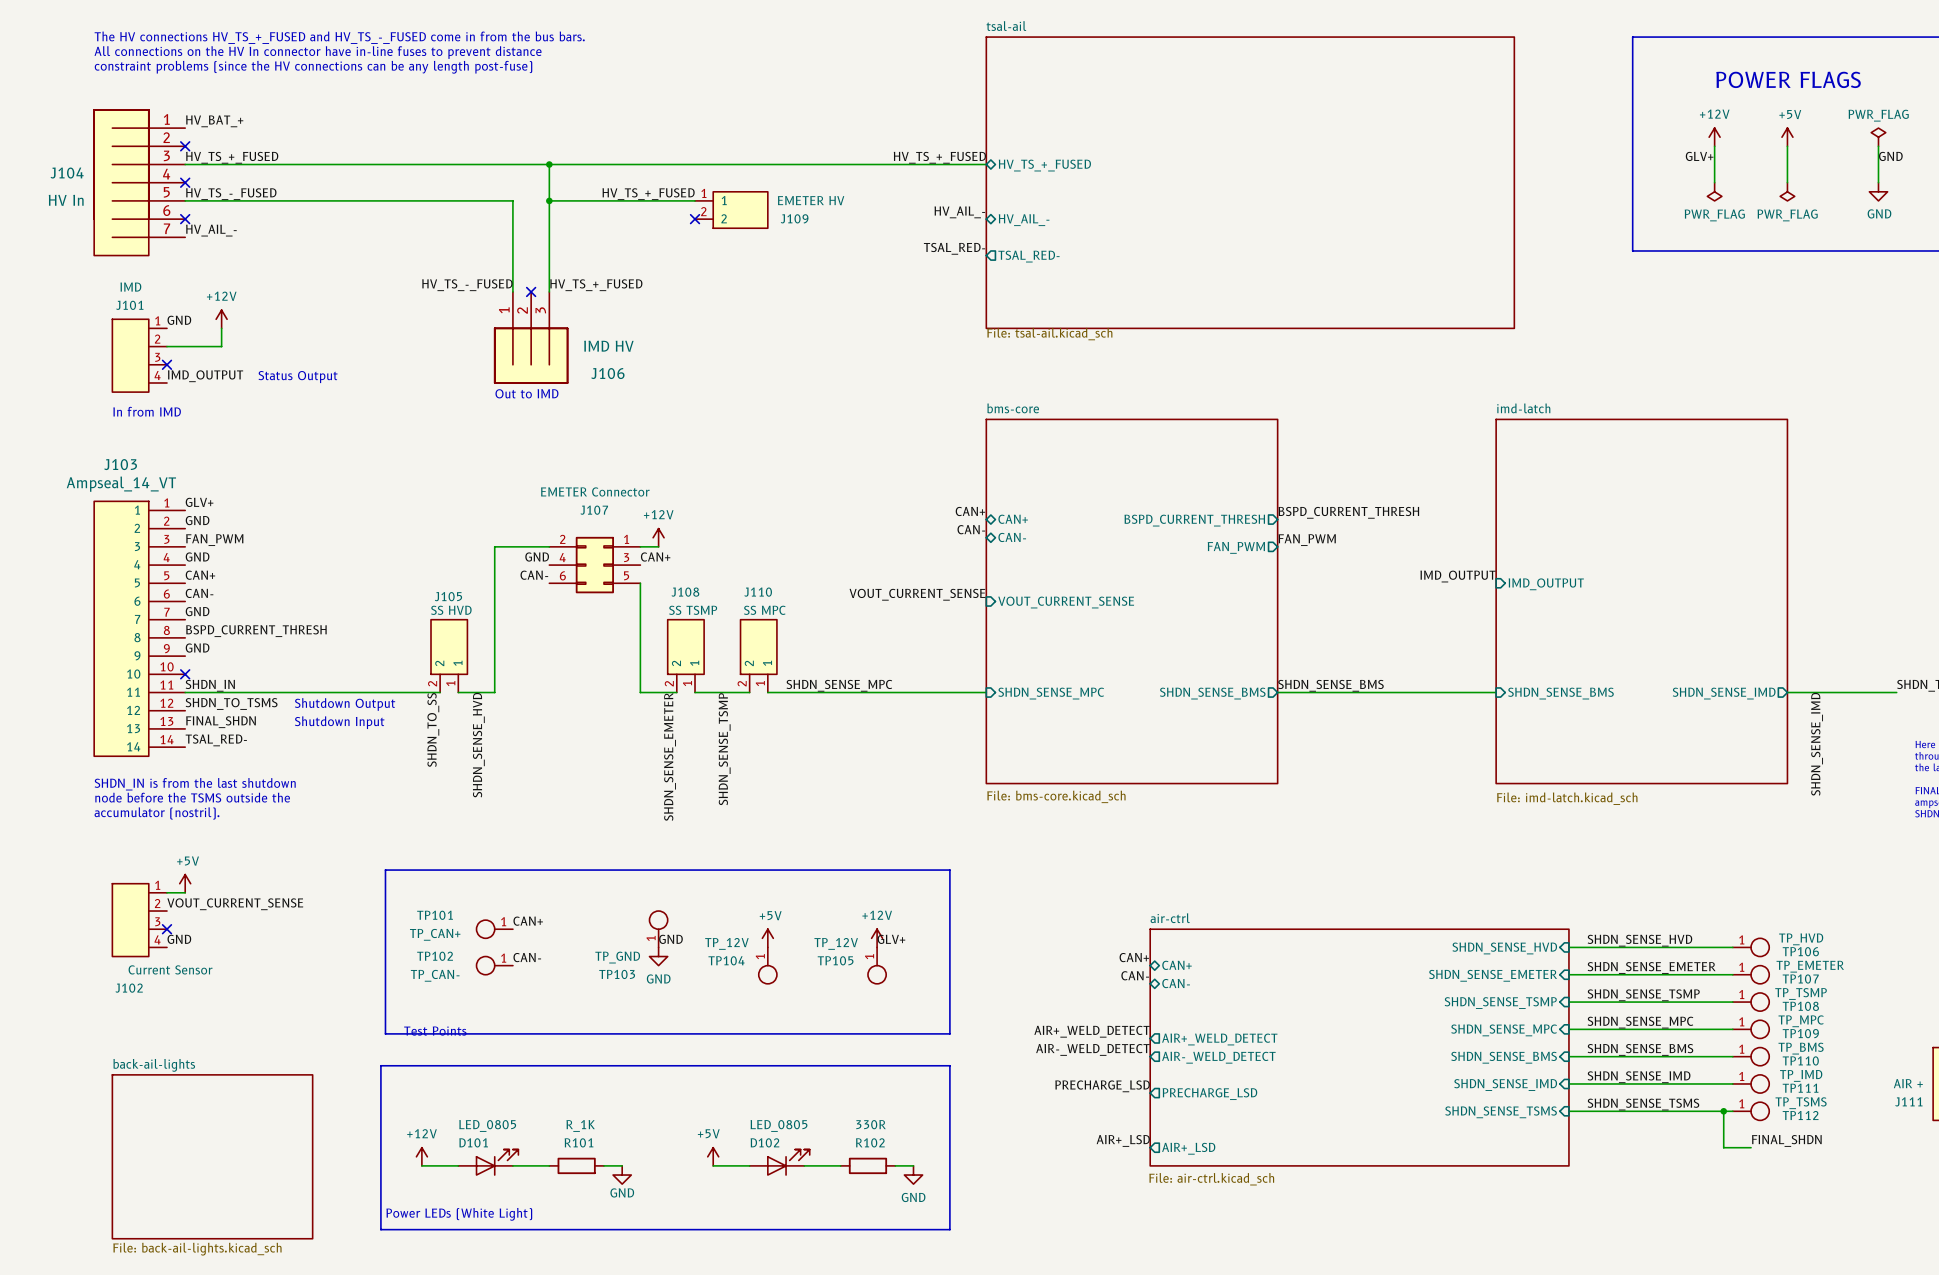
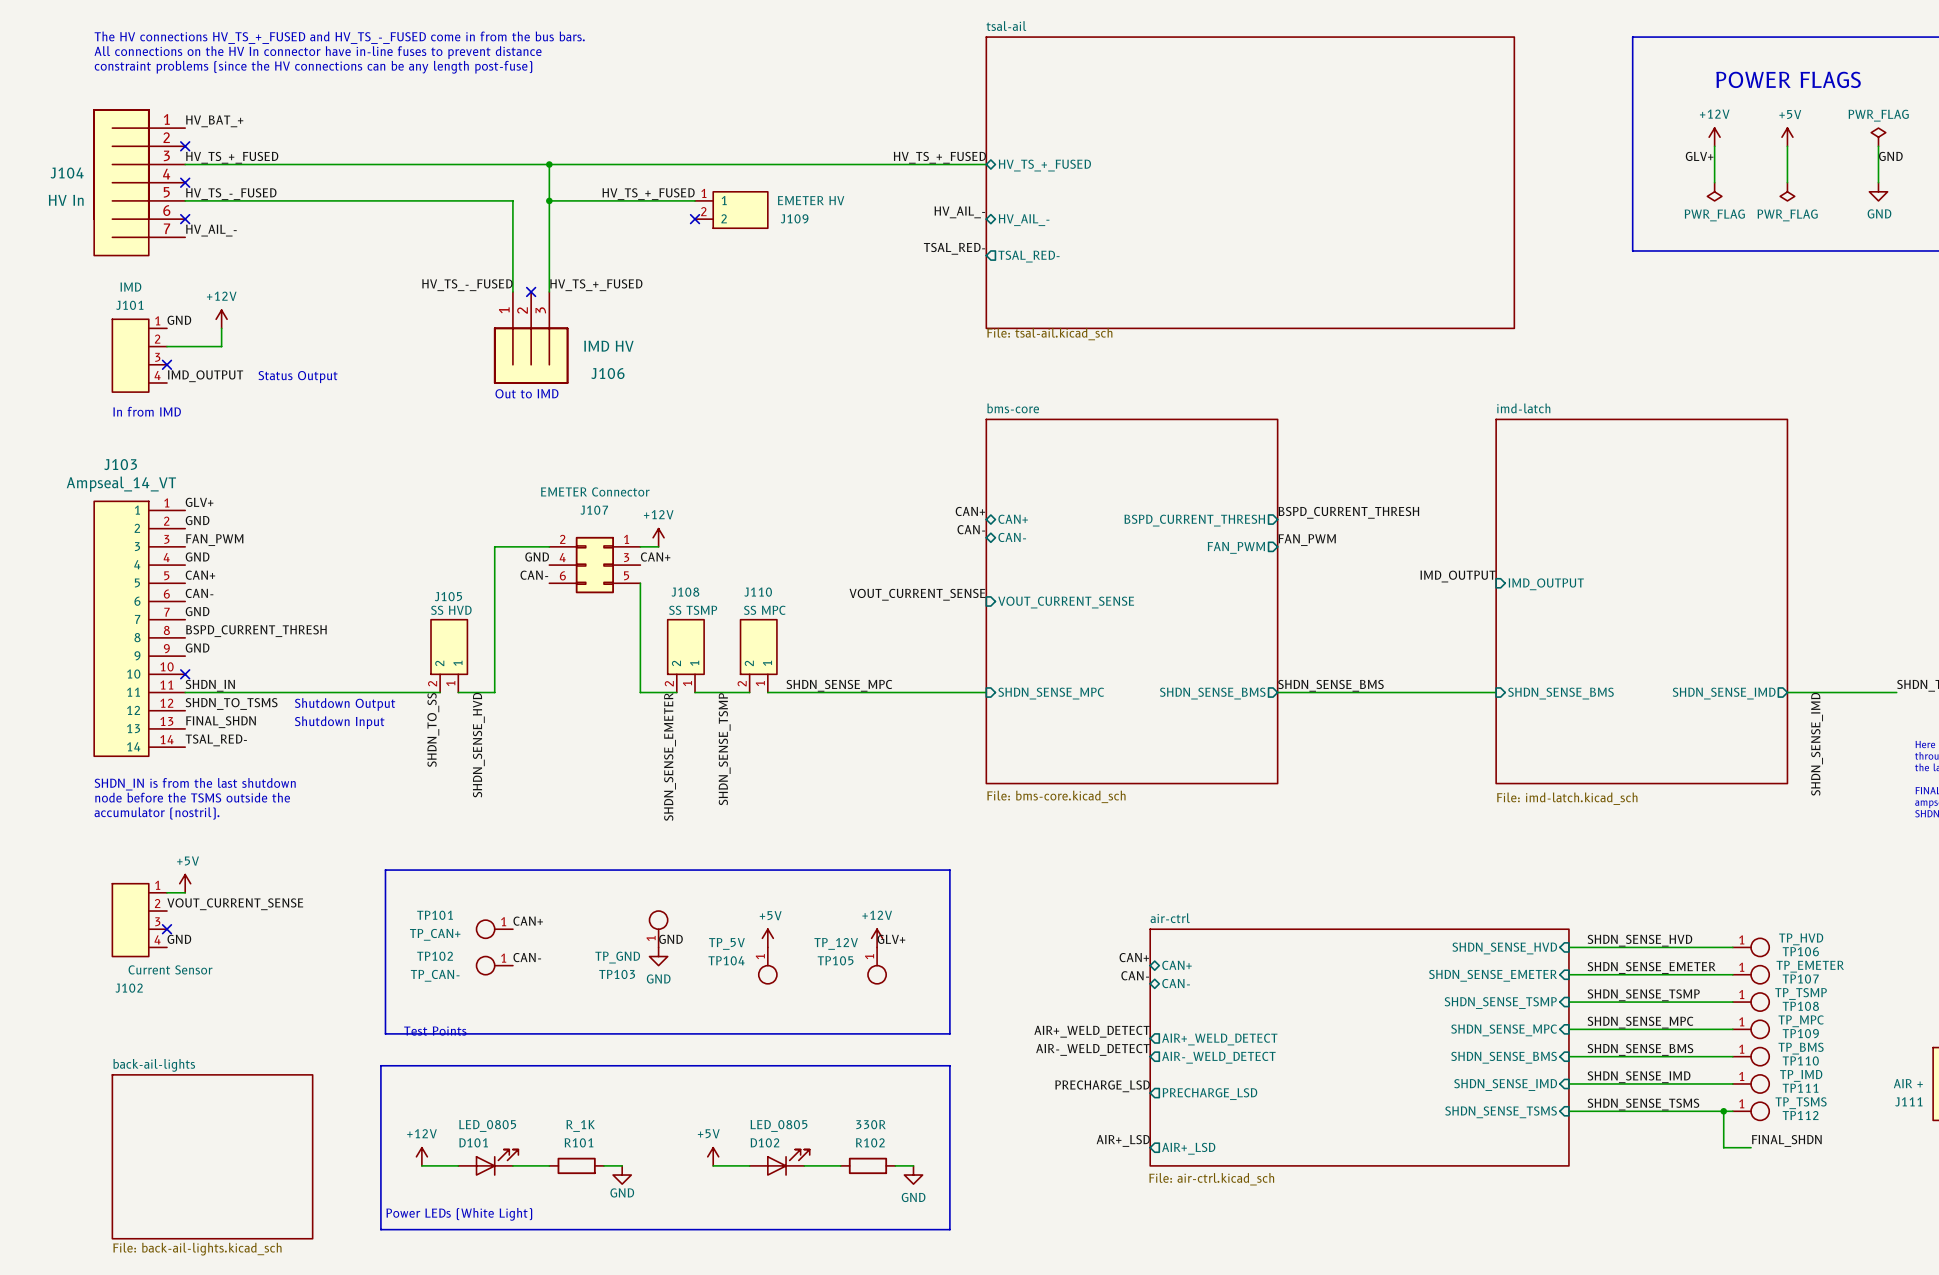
TP104 value: TP_12V (726, 943) -> TP_5V (726, 943)

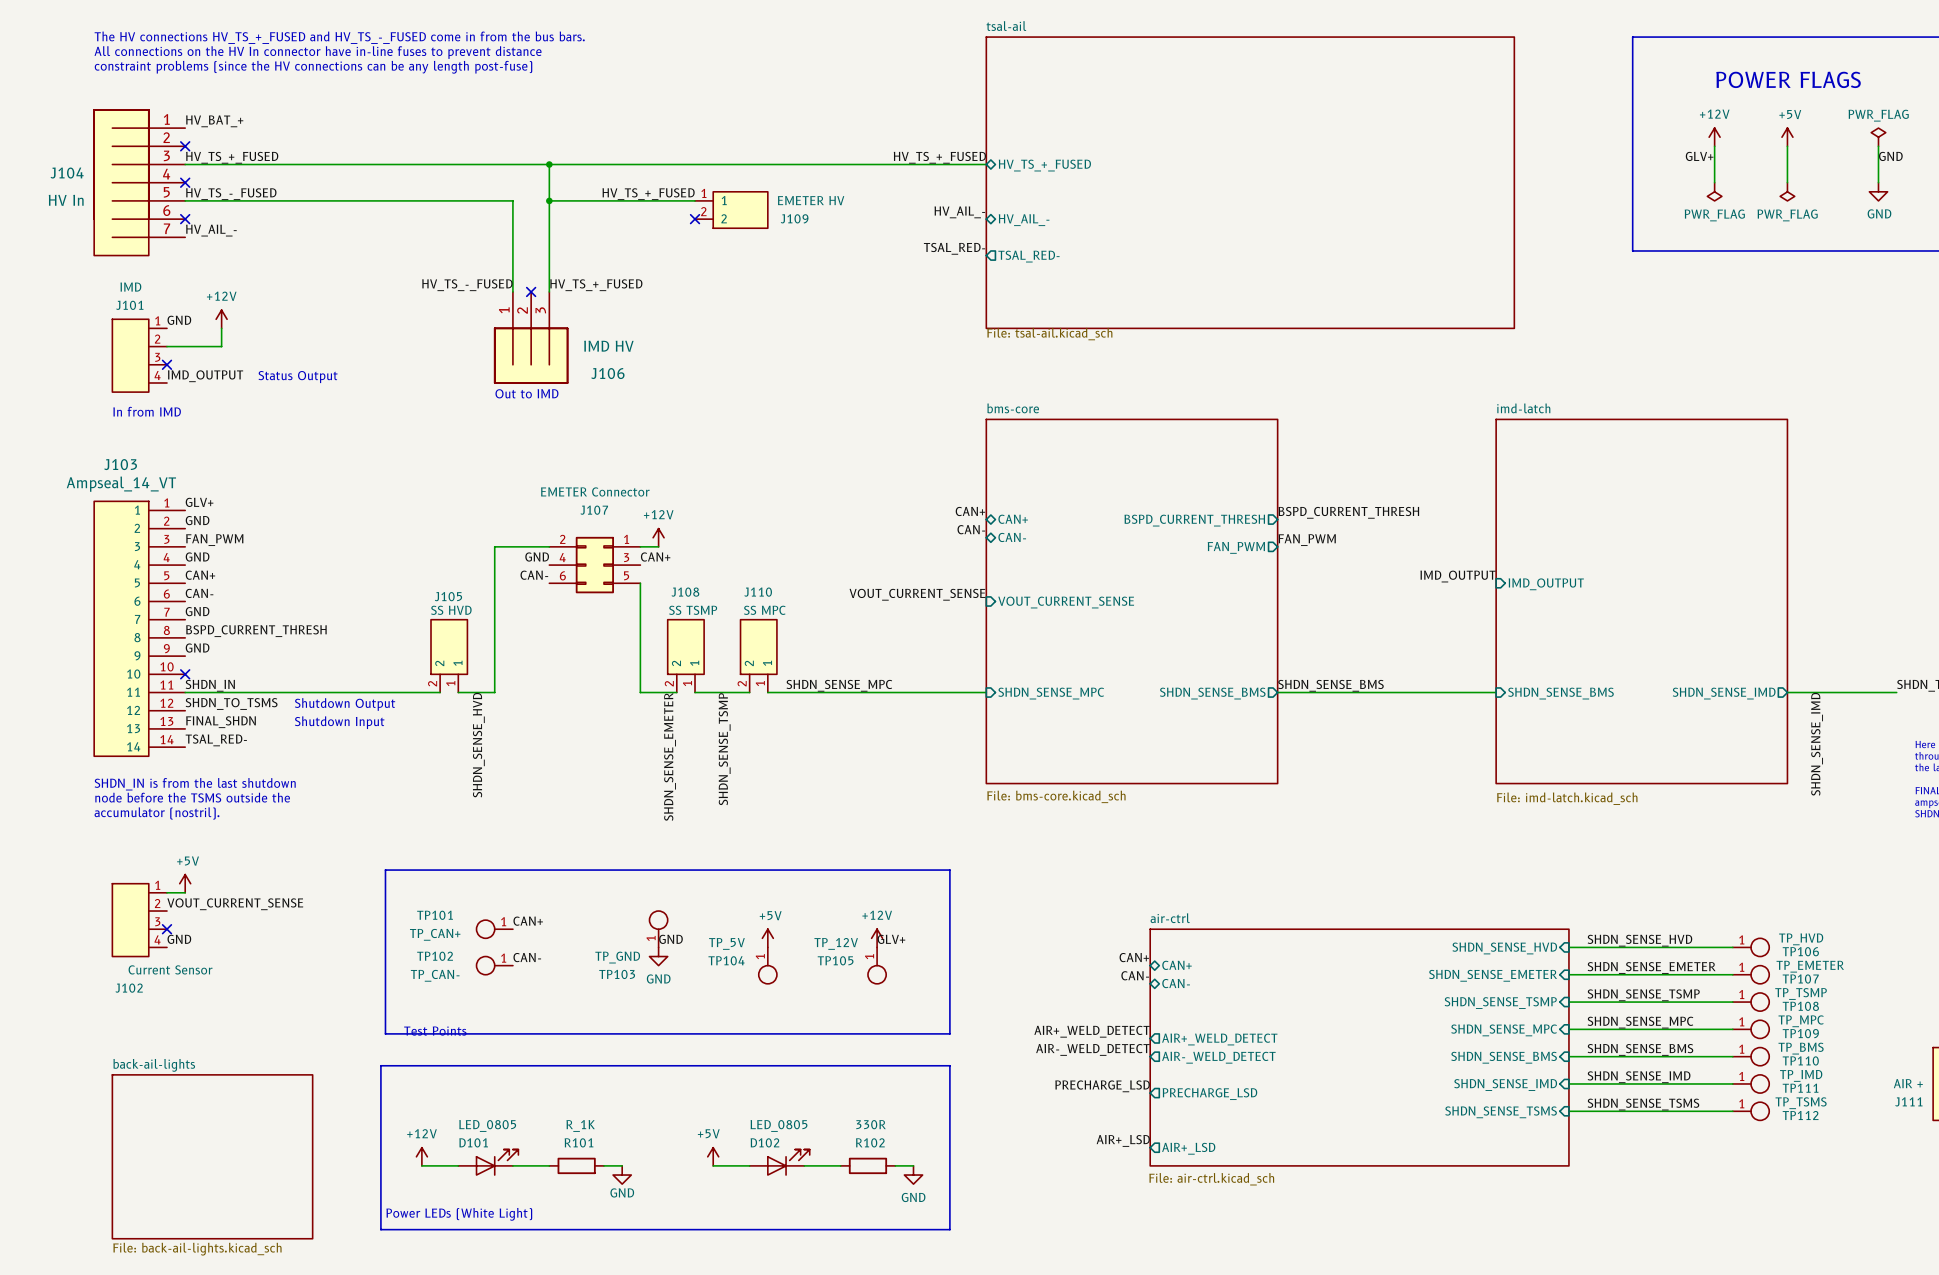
label: SHDN_TO_SS (433, 729) -> none
wire: (1723, 1111) (1723, 1147) (1751, 1147) -> none
junction: (1723, 1111) -> none
label: FINAL_SHDN (1786, 1140) -> none

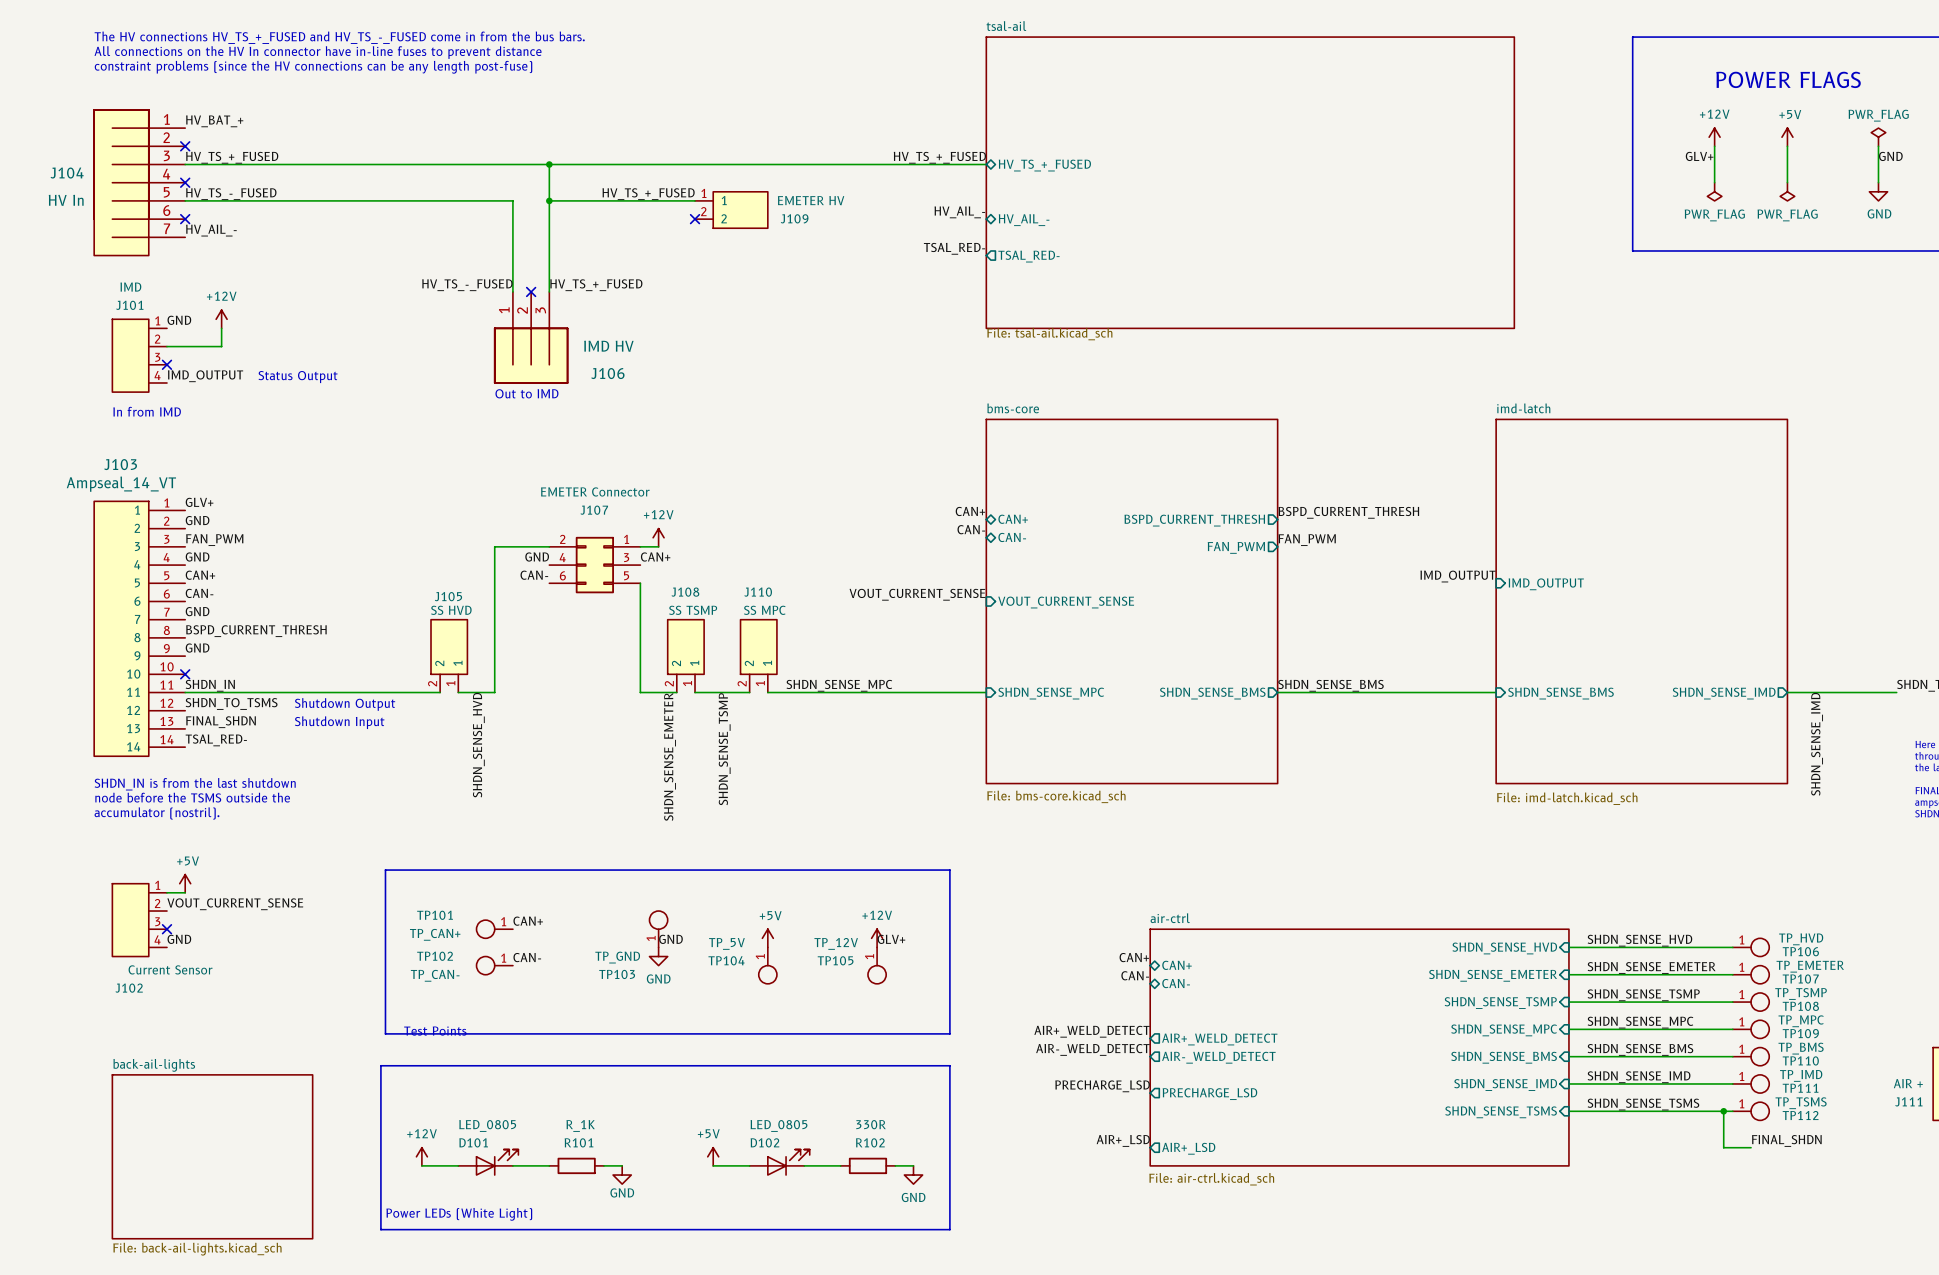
wire: none -> (1723, 1111) (1723, 1147) (1751, 1147)
junction: none -> (1723, 1111)
label: none -> FINAL_SHDN (1786, 1140)

